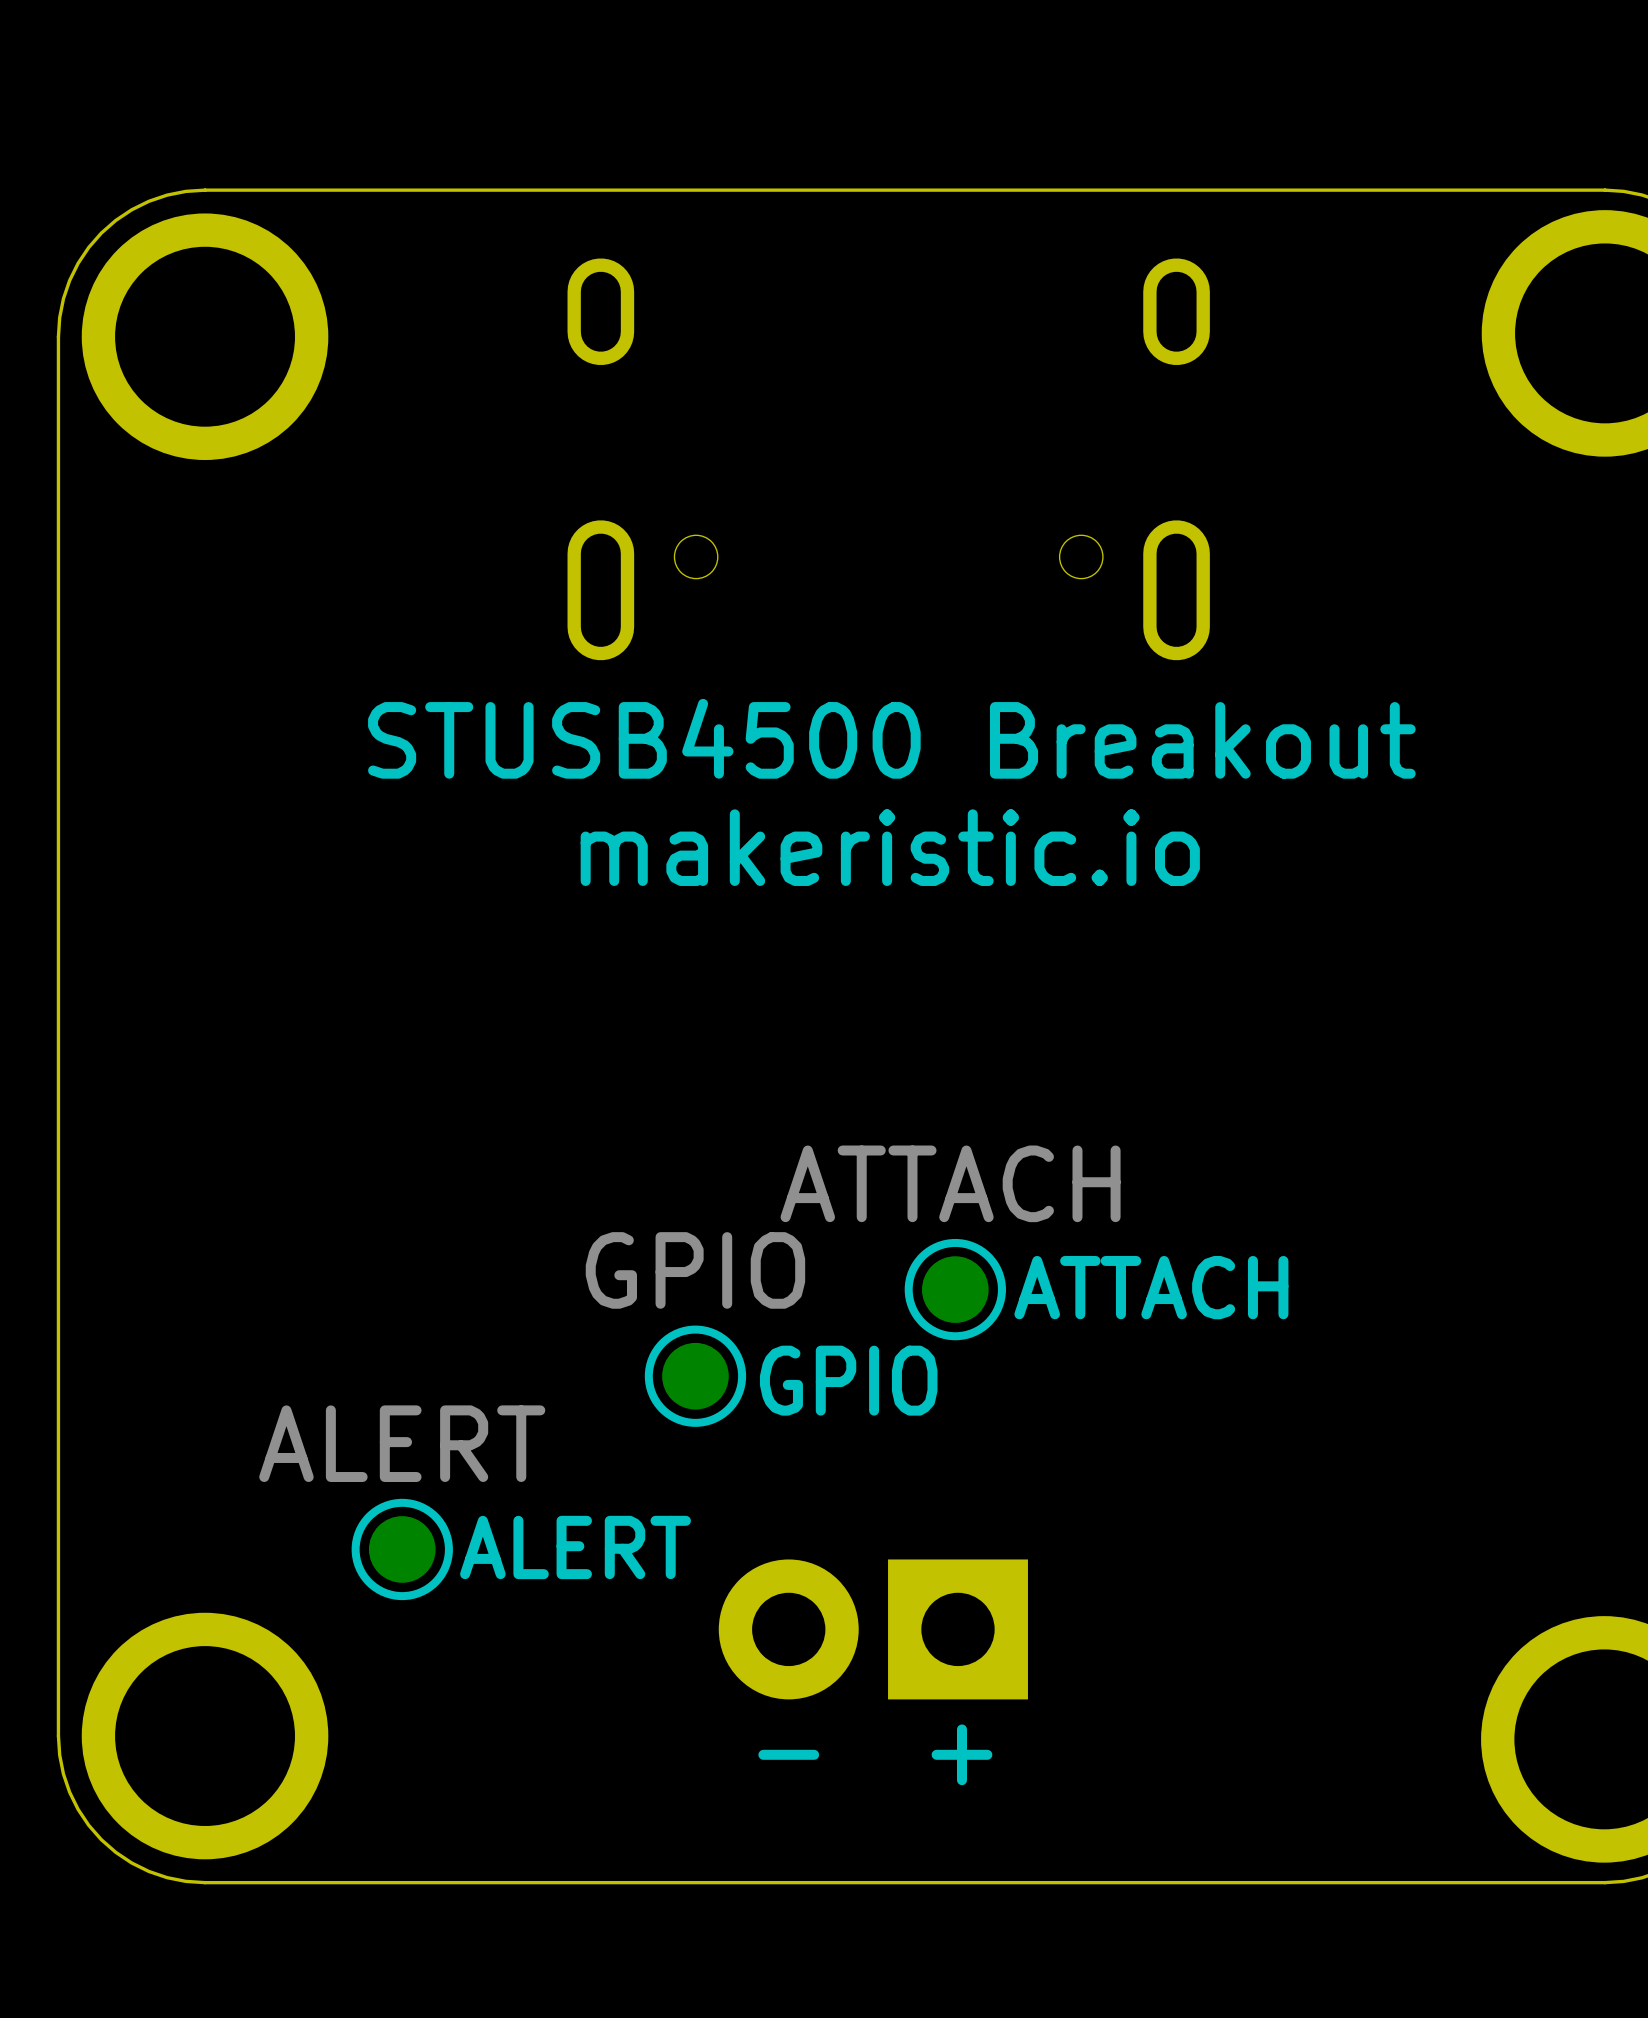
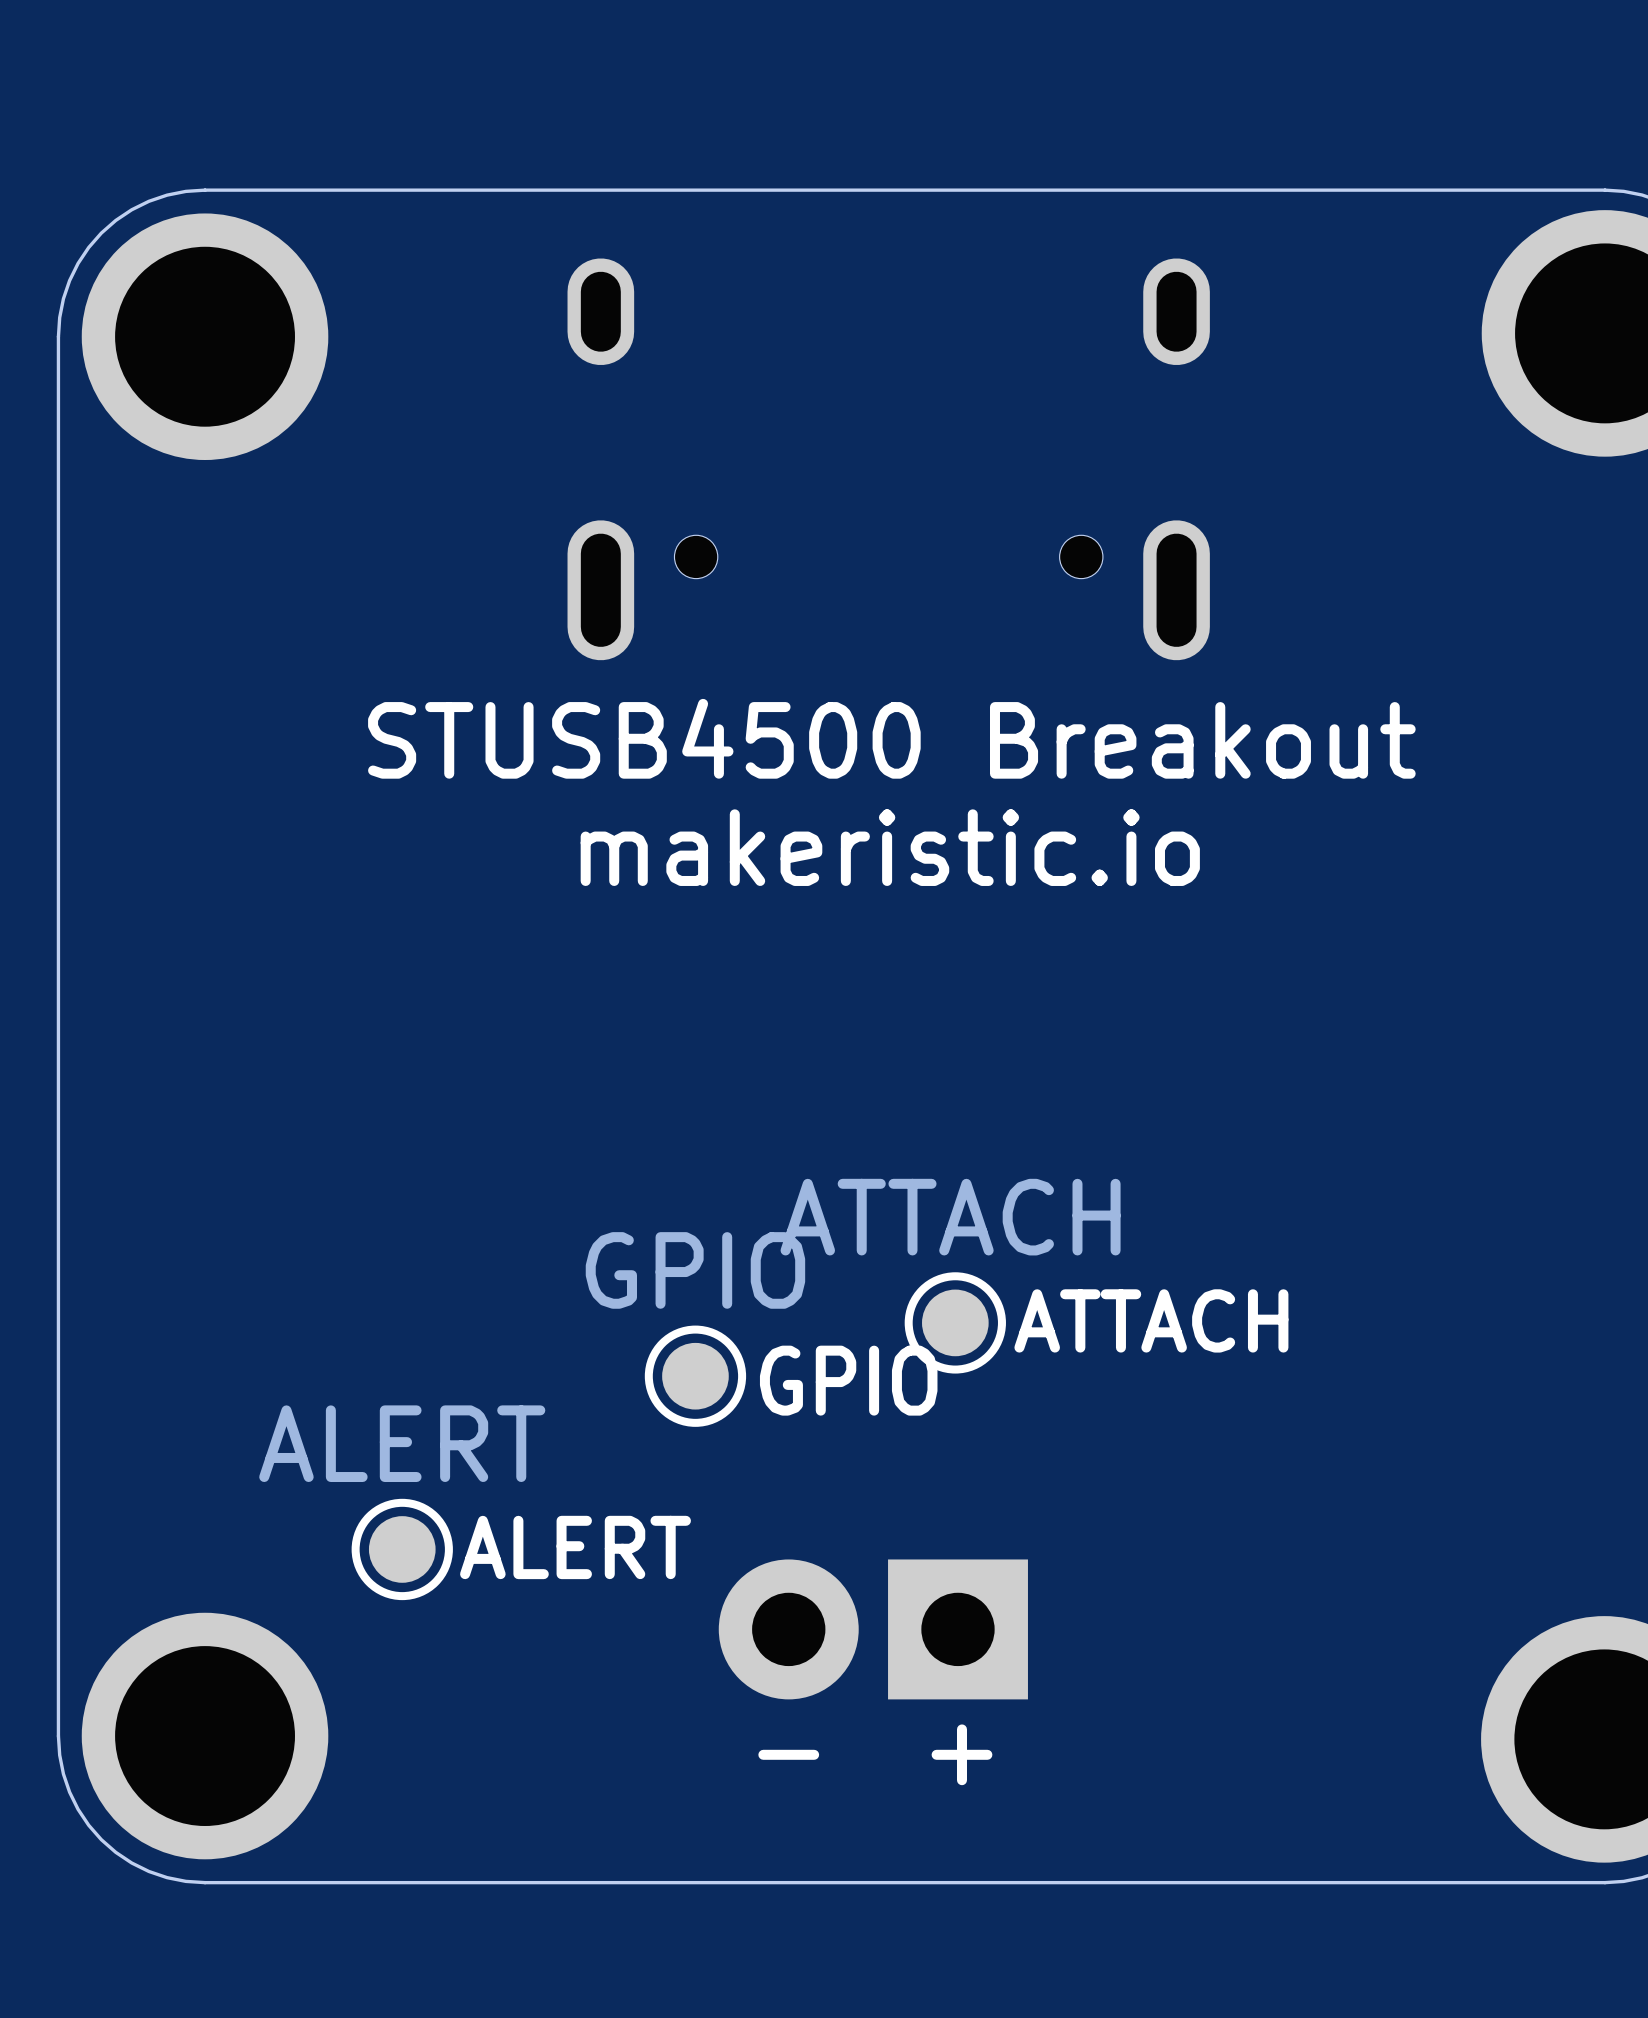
ATTACH position: (955, 1289) -> (955, 1322)

